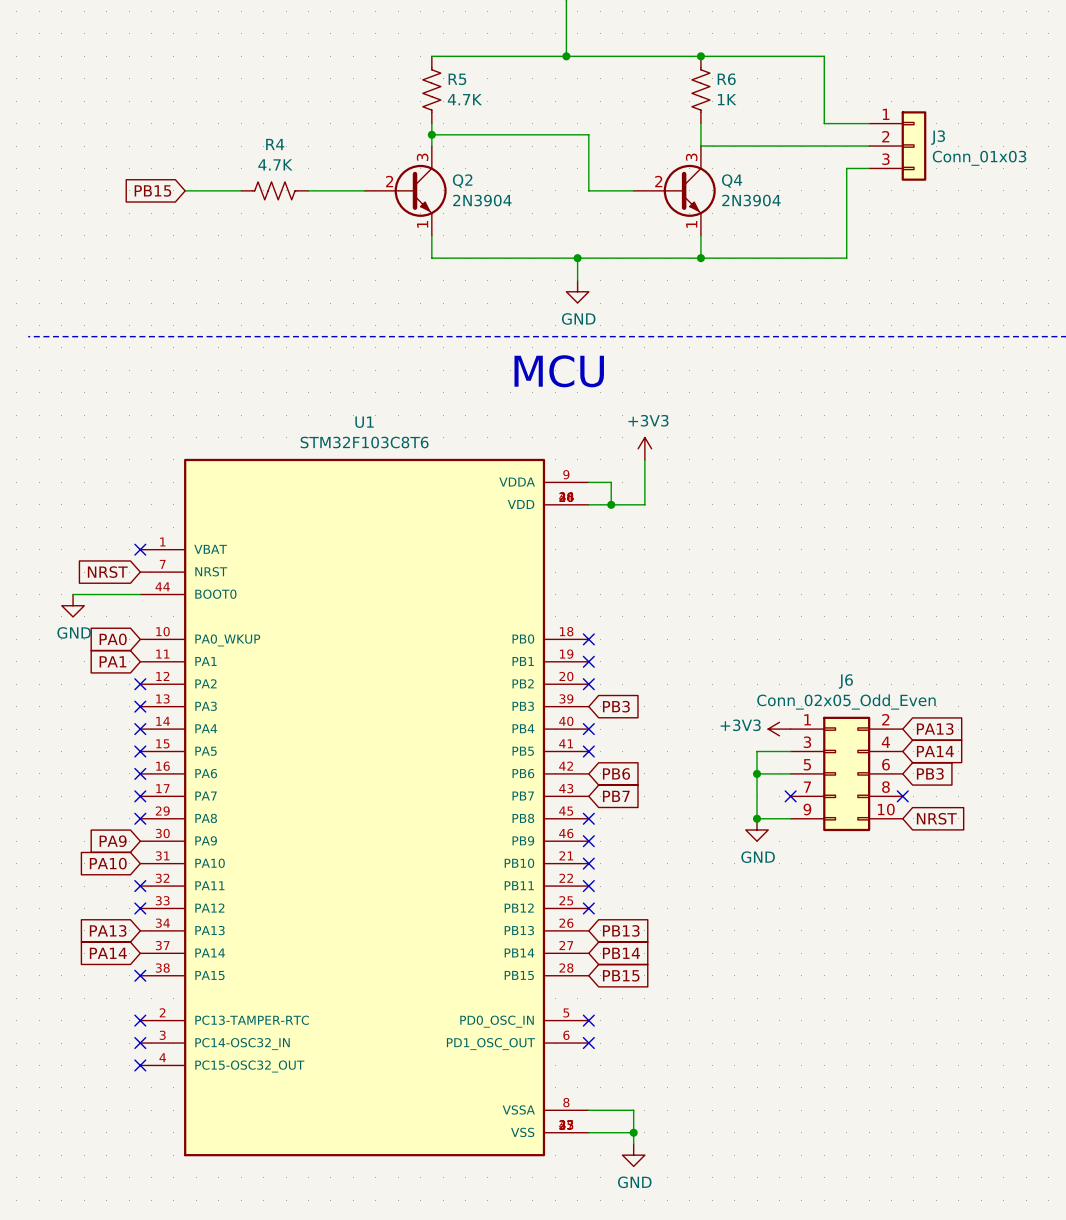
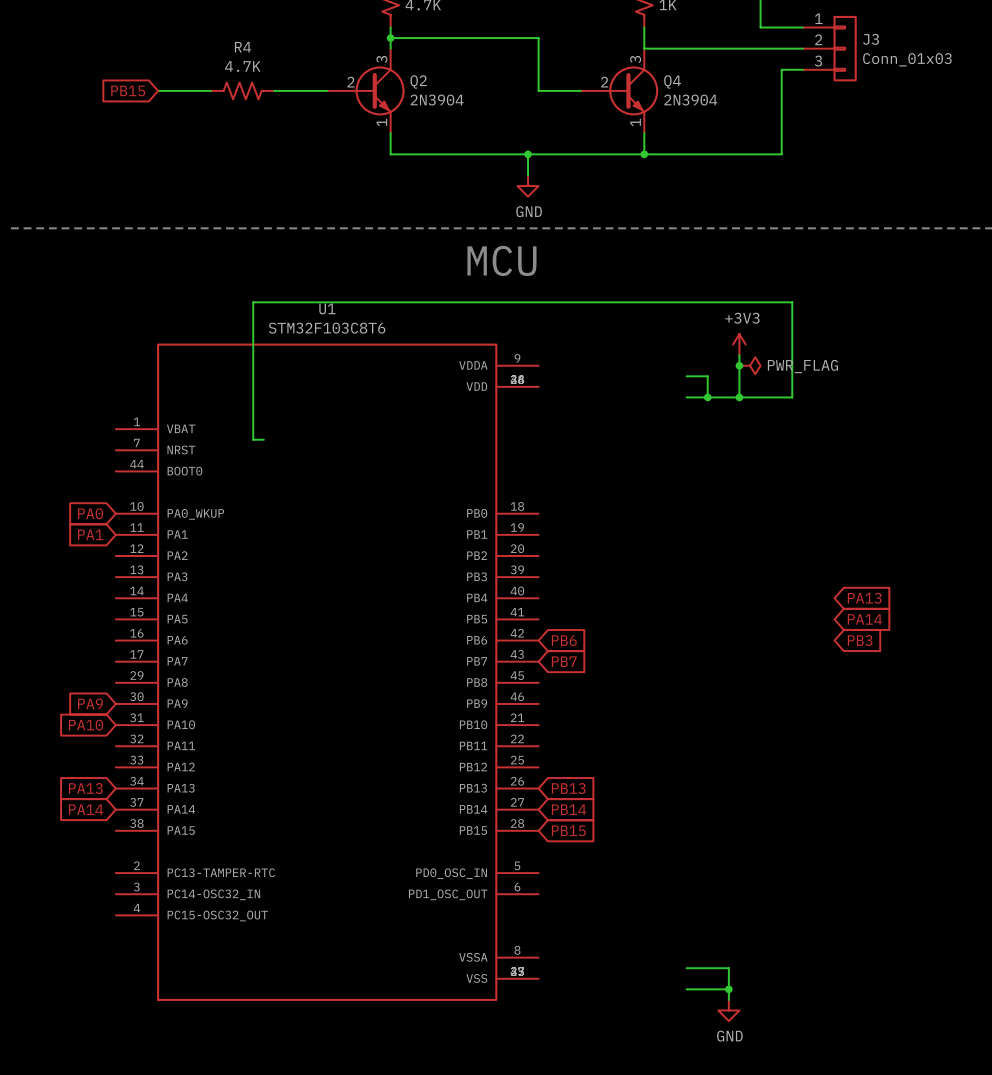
power symbol: +3V3 (644, 448) -> none
wire: (644, 459) (644, 504) (588, 504) -> none
power symbol: none -> +3V3 (739, 344)
wire: none -> (739, 355) (739, 397)
wire: (588, 482) (611, 482) (611, 504) -> (686, 376) (707, 376) (707, 397)
junction: none -> (739, 365)
power symbol: none -> PWR_FLAG (750, 365)
junction: (611, 504) -> none
wire: none -> (686, 397) (792, 397) (792, 302) (253, 302) (253, 439) (263, 439)
junction: none -> (707, 397)
junction: none -> (739, 397)
no-connect mark: (140, 549) -> none
global label: NRST (107, 572) -> none
wire: (73, 594) (140, 594) -> none
power symbol: GND (73, 605) -> none
no-connect mark: (588, 639) -> none
no-connect mark: (588, 661) -> none
no-connect mark: (140, 684) -> none
no-connect mark: (588, 684) -> none
no-connect mark: (140, 706) -> none
global label: PB3 (616, 706) -> none
no-connect mark: (140, 729) -> none
no-connect mark: (588, 729) -> none
power symbol: +3V3 (779, 729) -> none
no-connect mark: (140, 751) -> none
no-connect mark: (588, 751) -> none
wire: (790, 751) (757, 751) (757, 818) (790, 818) -> none
no-connect mark: (140, 773) -> none
wire: (757, 773) (790, 773) -> none
junction: (757, 773) -> none
J6: Conn_02x05_Odd_Even (846, 773) -> none
no-connect mark: (140, 796) -> none
no-connect mark: (790, 796) -> none
no-connect mark: (902, 796) -> none
no-connect mark: (140, 818) -> none
no-connect mark: (588, 818) -> none
junction: (757, 818) -> none
global label: NRST (936, 818) -> none
power symbol: GND (757, 829) -> none
no-connect mark: (588, 841) -> none
no-connect mark: (588, 863) -> none
no-connect mark: (140, 886) -> none
no-connect mark: (588, 886) -> none
no-connect mark: (140, 908) -> none
no-connect mark: (588, 908) -> none
no-connect mark: (140, 975) -> none
no-connect mark: (140, 1020) -> none
no-connect mark: (588, 1020) -> none
no-connect mark: (140, 1043) -> none
no-connect mark: (588, 1043) -> none
no-connect mark: (140, 1065) -> none
wire: (588, 1110) (633, 1110) (633, 1143) -> (686, 968) (728, 968) (728, 999)
wire: (588, 1132) (633, 1132) -> (686, 989) (728, 989)
junction: (633, 1132) -> none
junction: none -> (728, 989)
power symbol position: GND (633, 1155) -> GND (728, 1010)

